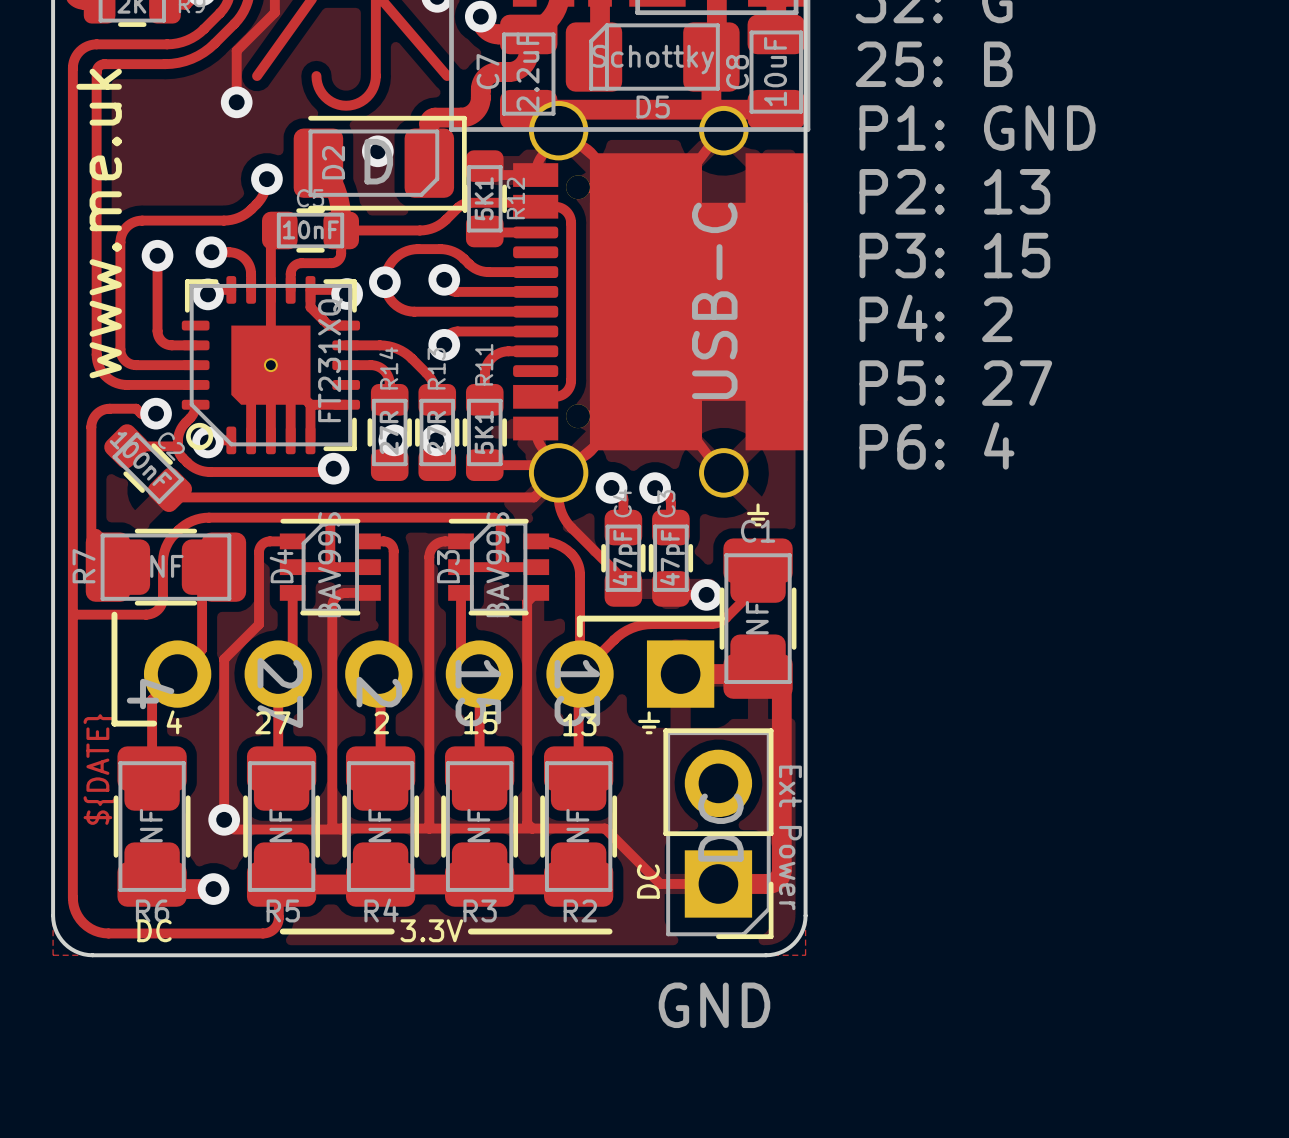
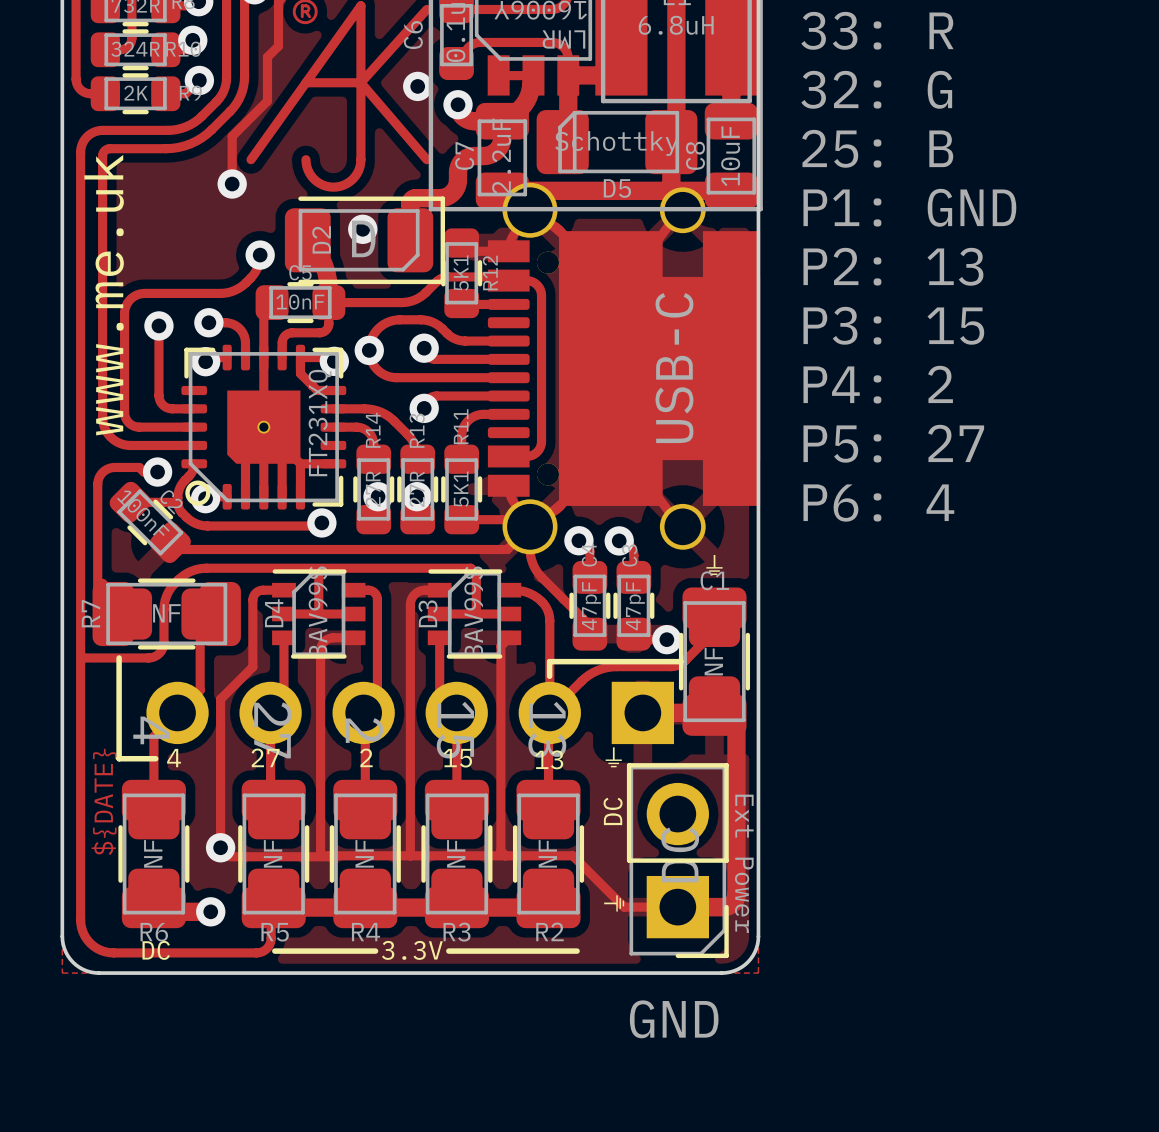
text: none -> DC (613, 811)
text: DC (648, 881) -> ⏚ (614, 903)

